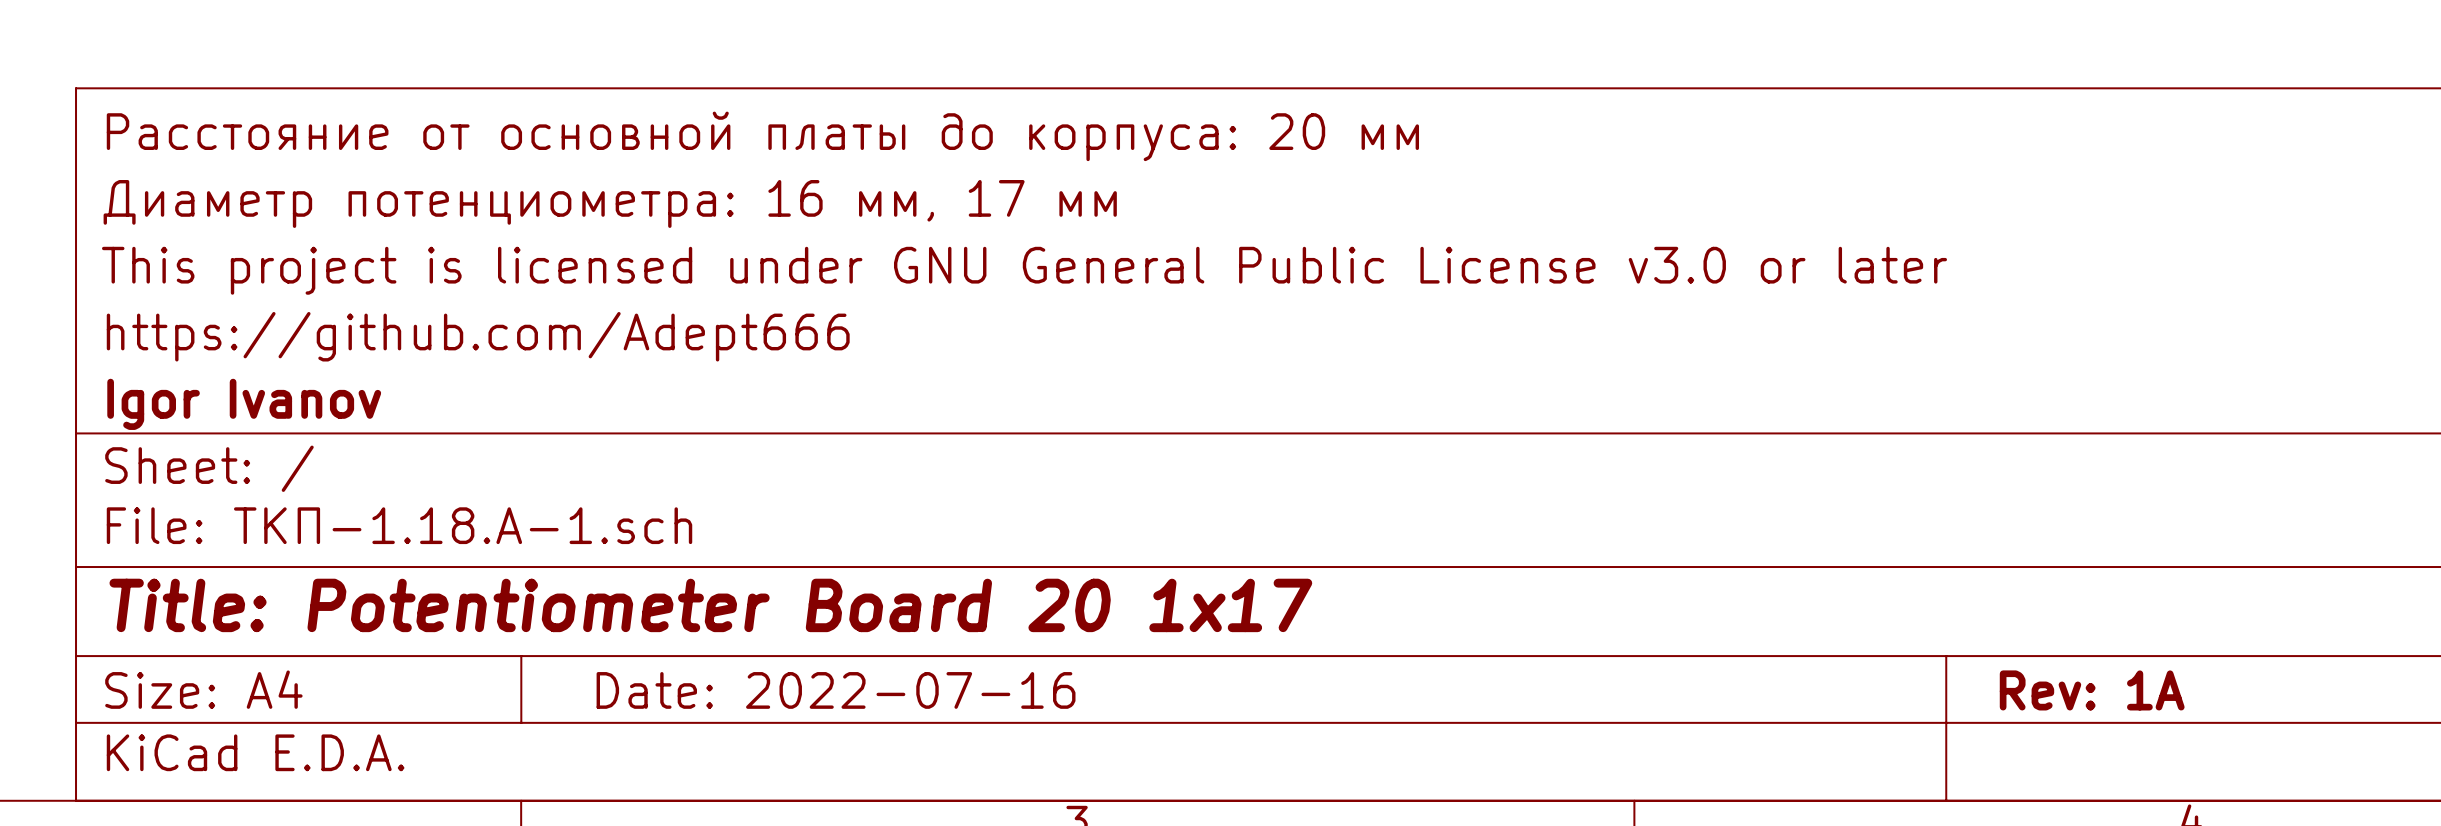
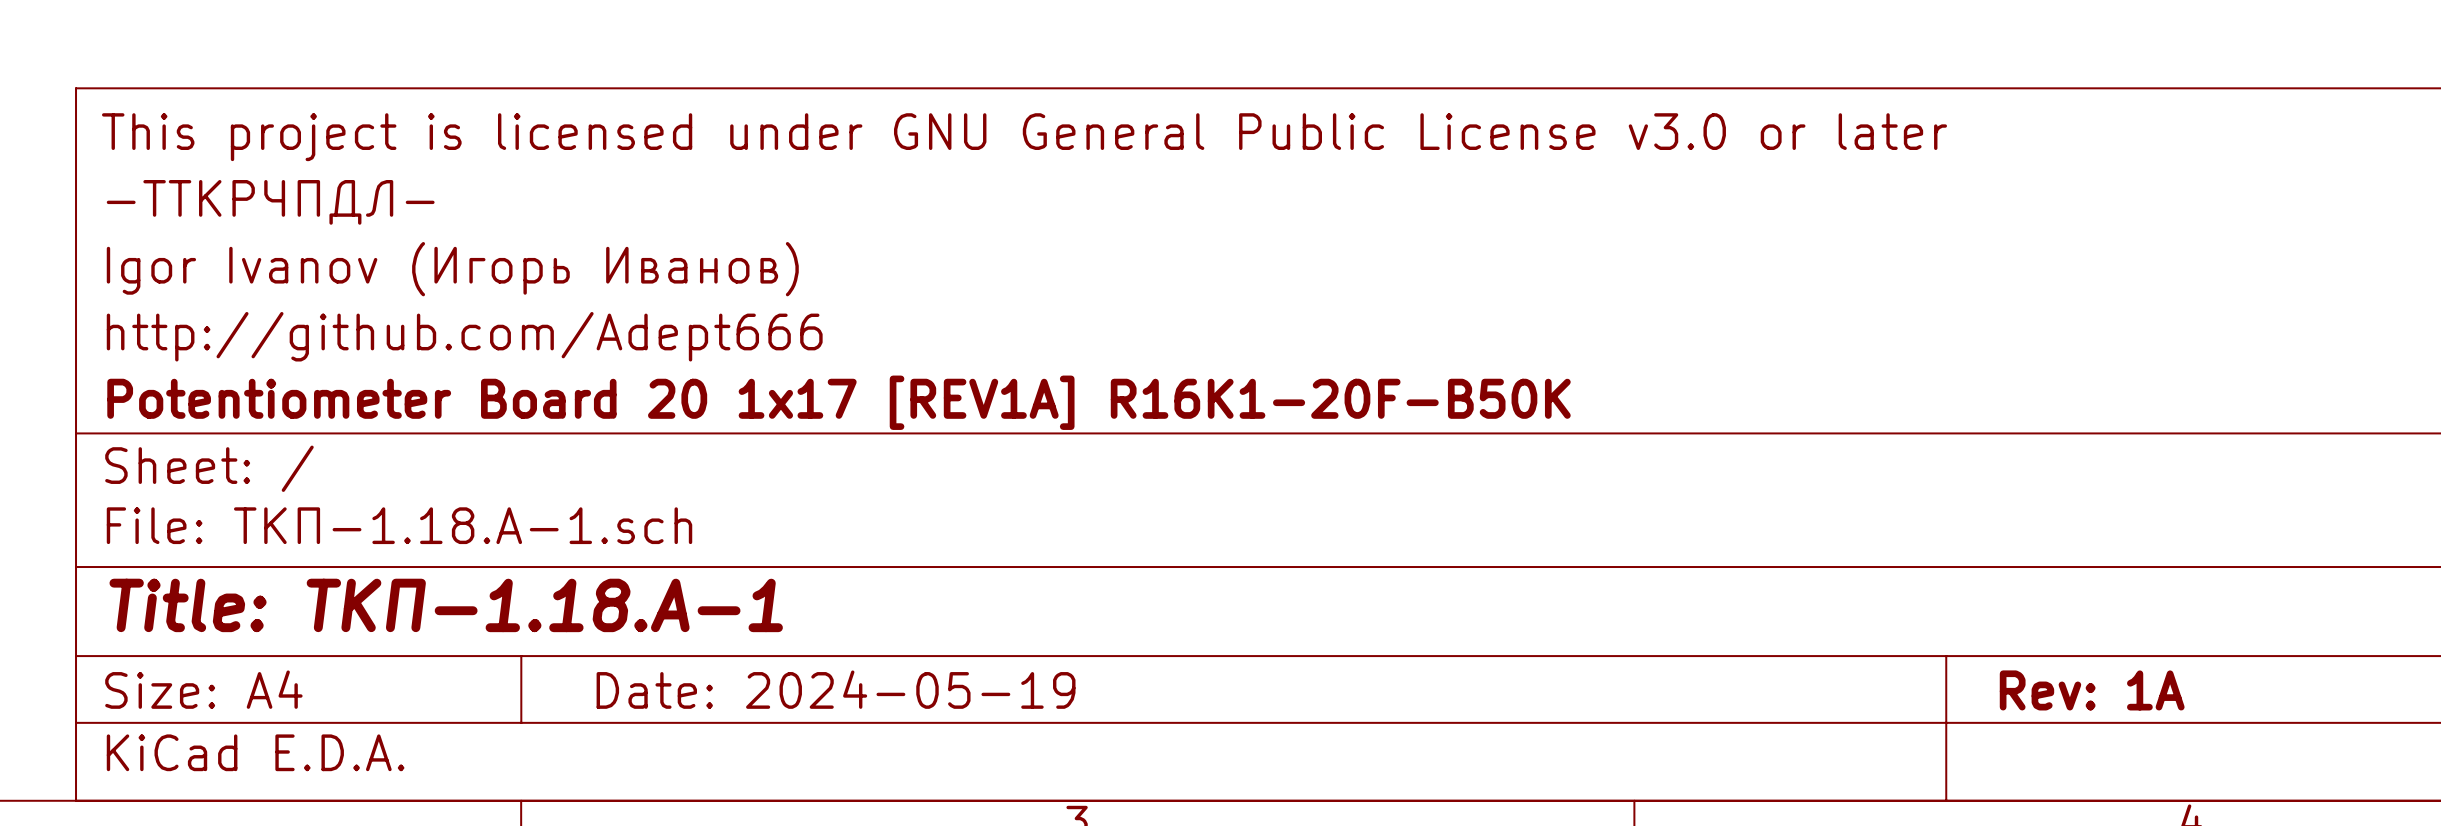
title block: Расстояние от основной платы до корпуса: 20 мм (762, 136) -> This project is licensed under GNU General Public License v3.0 or later (1024, 137)
title block: Диаметр потенциометра: 16 мм, 17 мм (610, 203) -> -ТТКРЧПДЛ- (270, 202)
title block: This project is licensed under GNU General Public License v3.0 or later (1024, 270) -> Igor Ivanov (Игорь Иванов) (452, 269)
title block: https://github.com/Adept666 (478, 336) -> http://github.com/Adept666 (464, 336)
title block: Igor Ivanov (244, 404) -> Potentiometer Board 20 1x17 [REV1A] R16K1-20F-B50K (839, 402)
title block: Title: Potentiometer Board 20 1x17 (710, 605) -> Title: ТКП-1.18.A-1 (446, 605)
title block: Date: 2022-07-16 (836, 690) -> Date: 2024-05-19 (836, 689)

